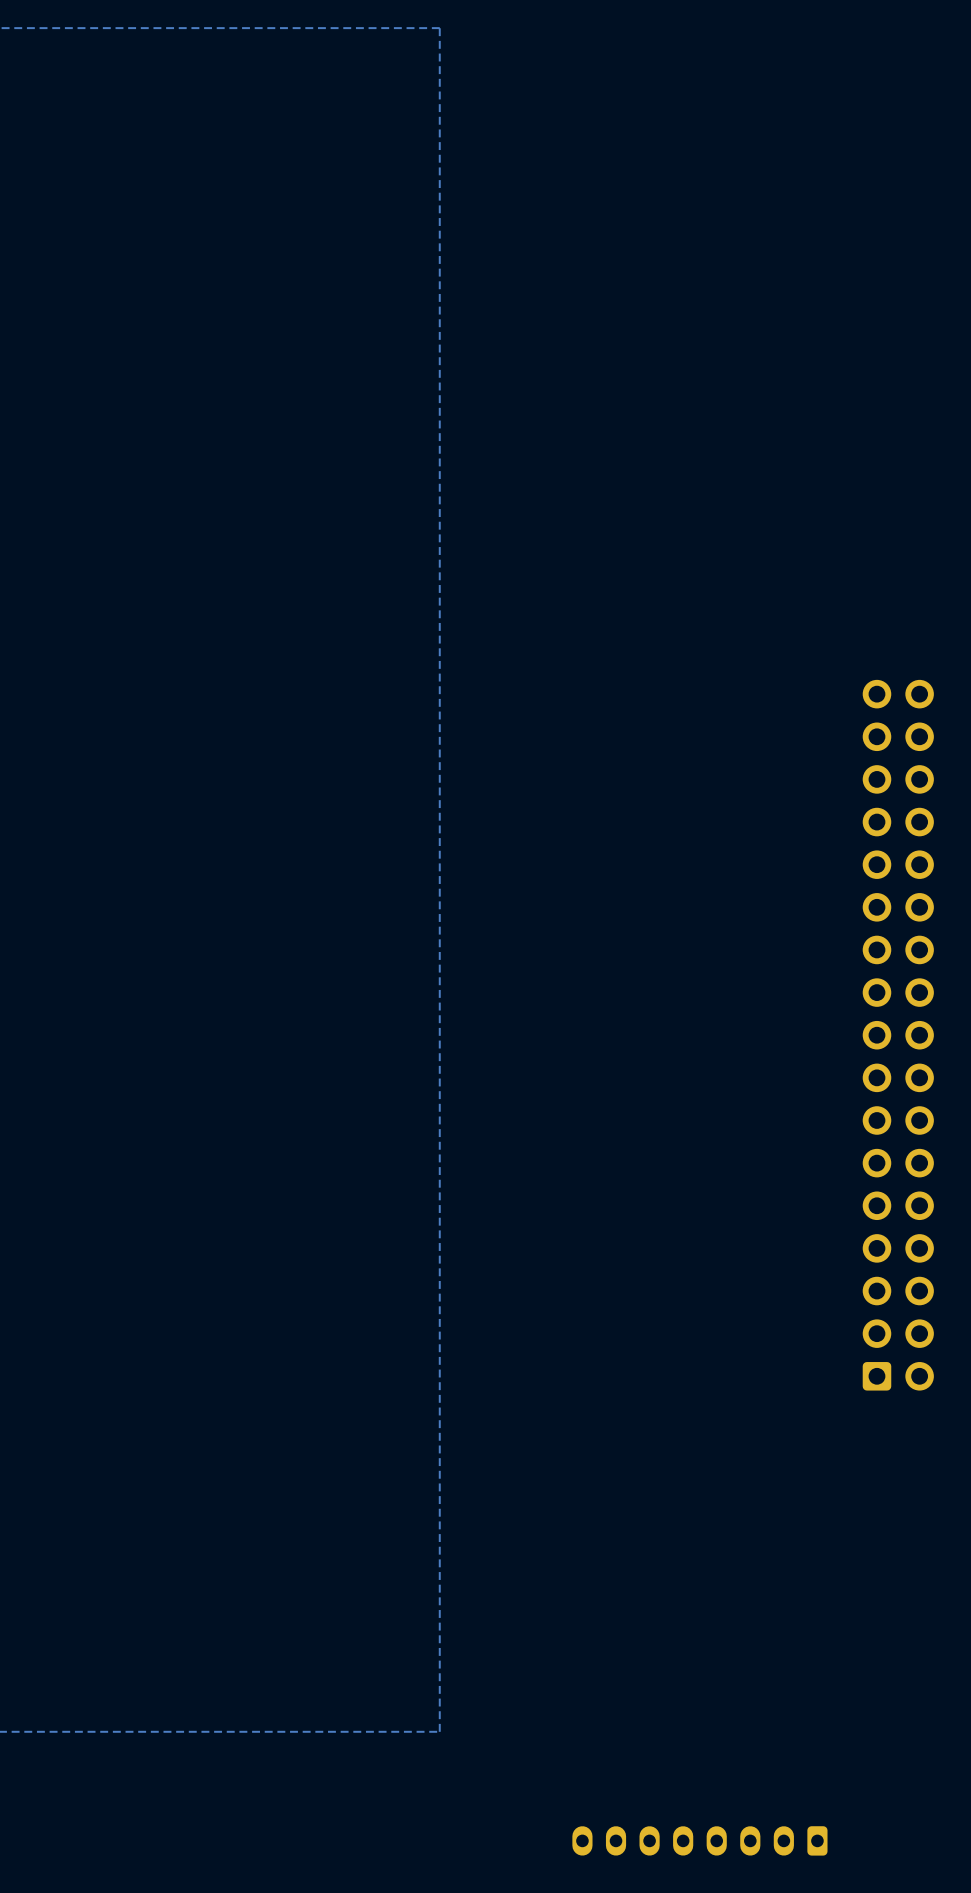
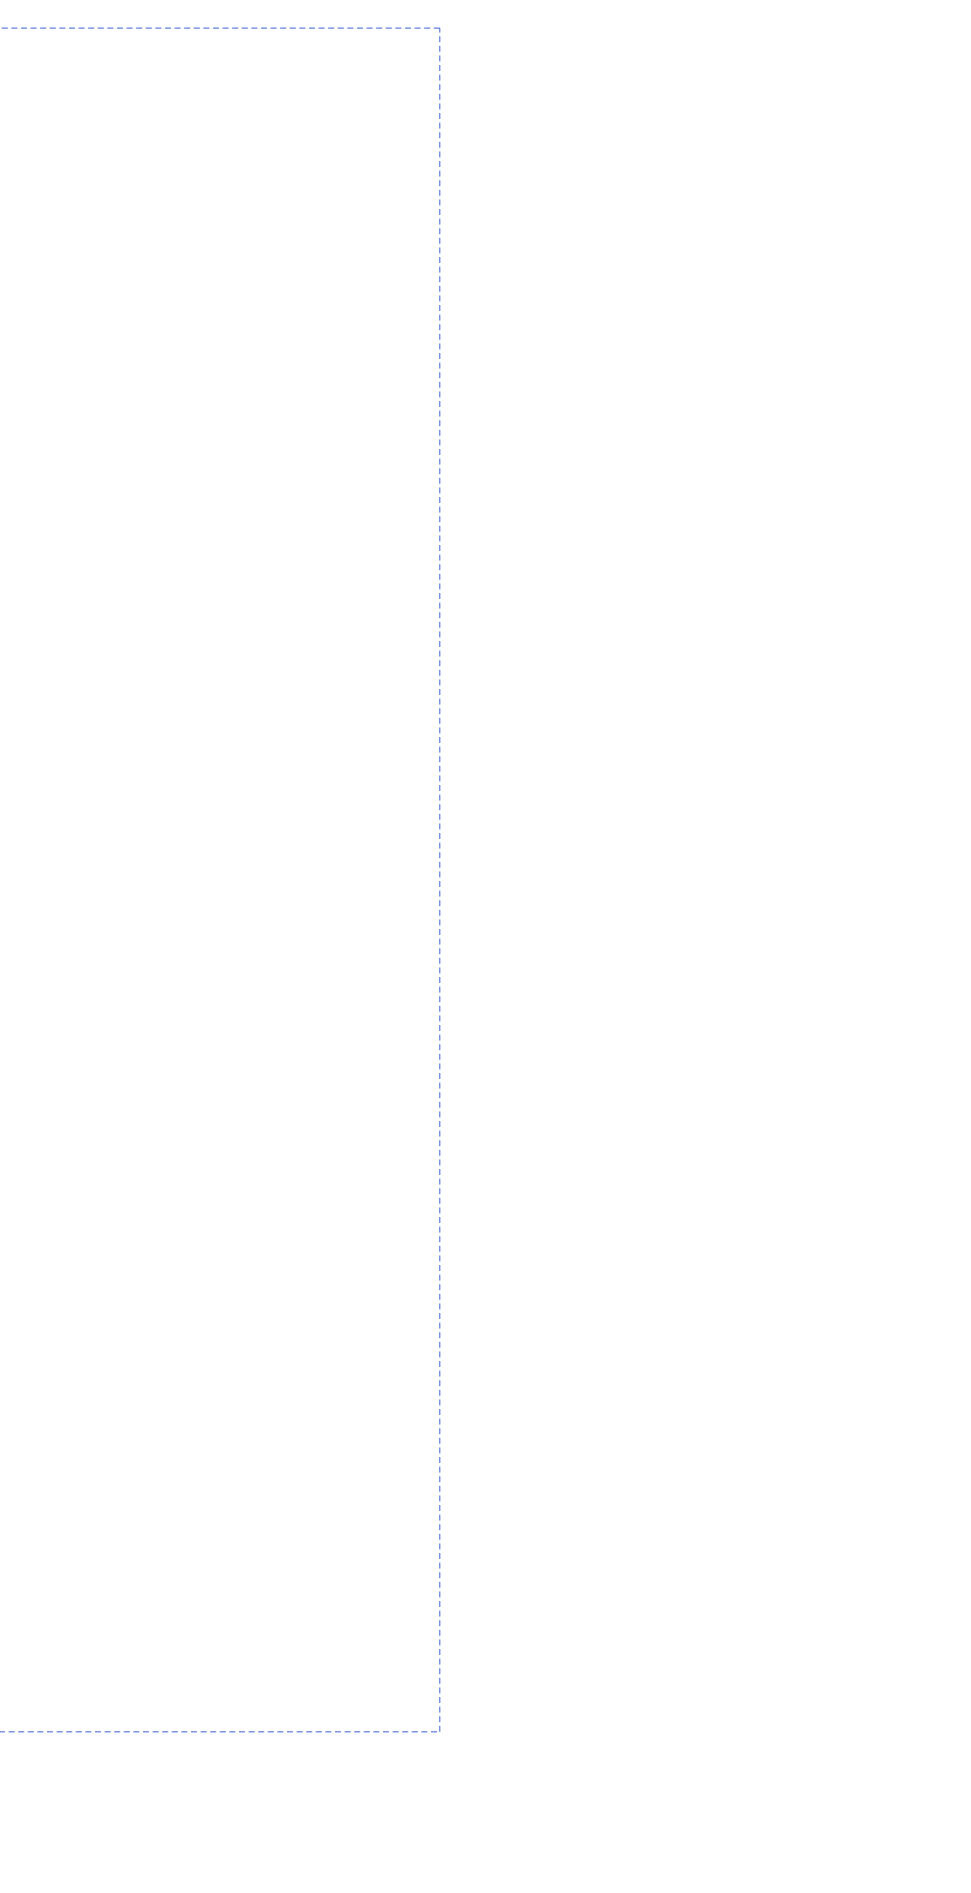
part: (898, 1035) -> none
part: (699, 1840) -> none

